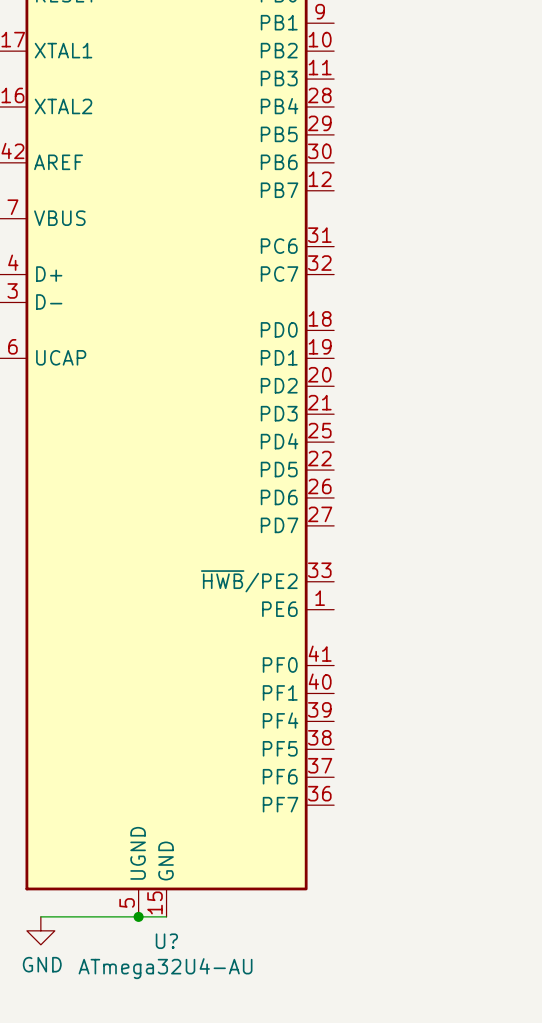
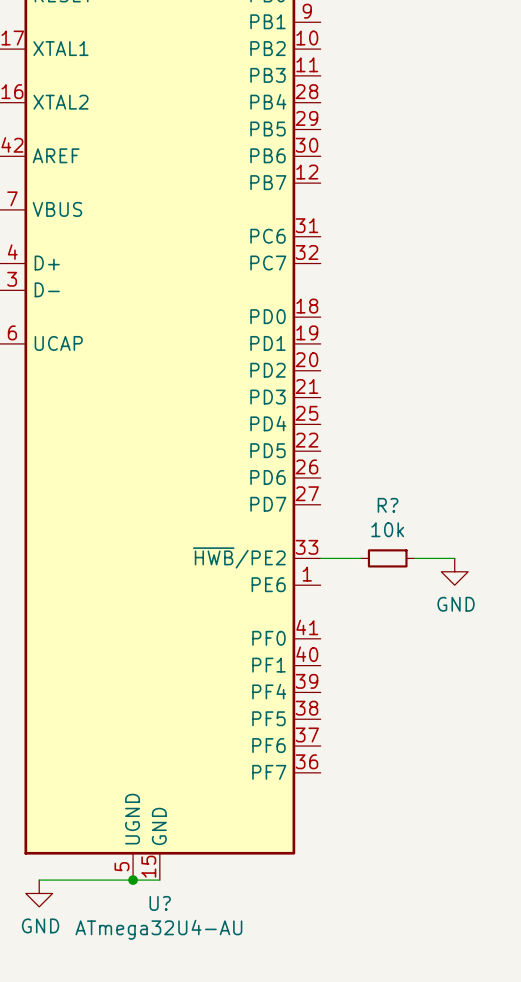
wire: none -> (320, 558) (360, 558)
R?: none -> 10k (387, 558)
wire: none -> (414, 558) (454, 558)
power symbol: none -> GND (454, 571)

